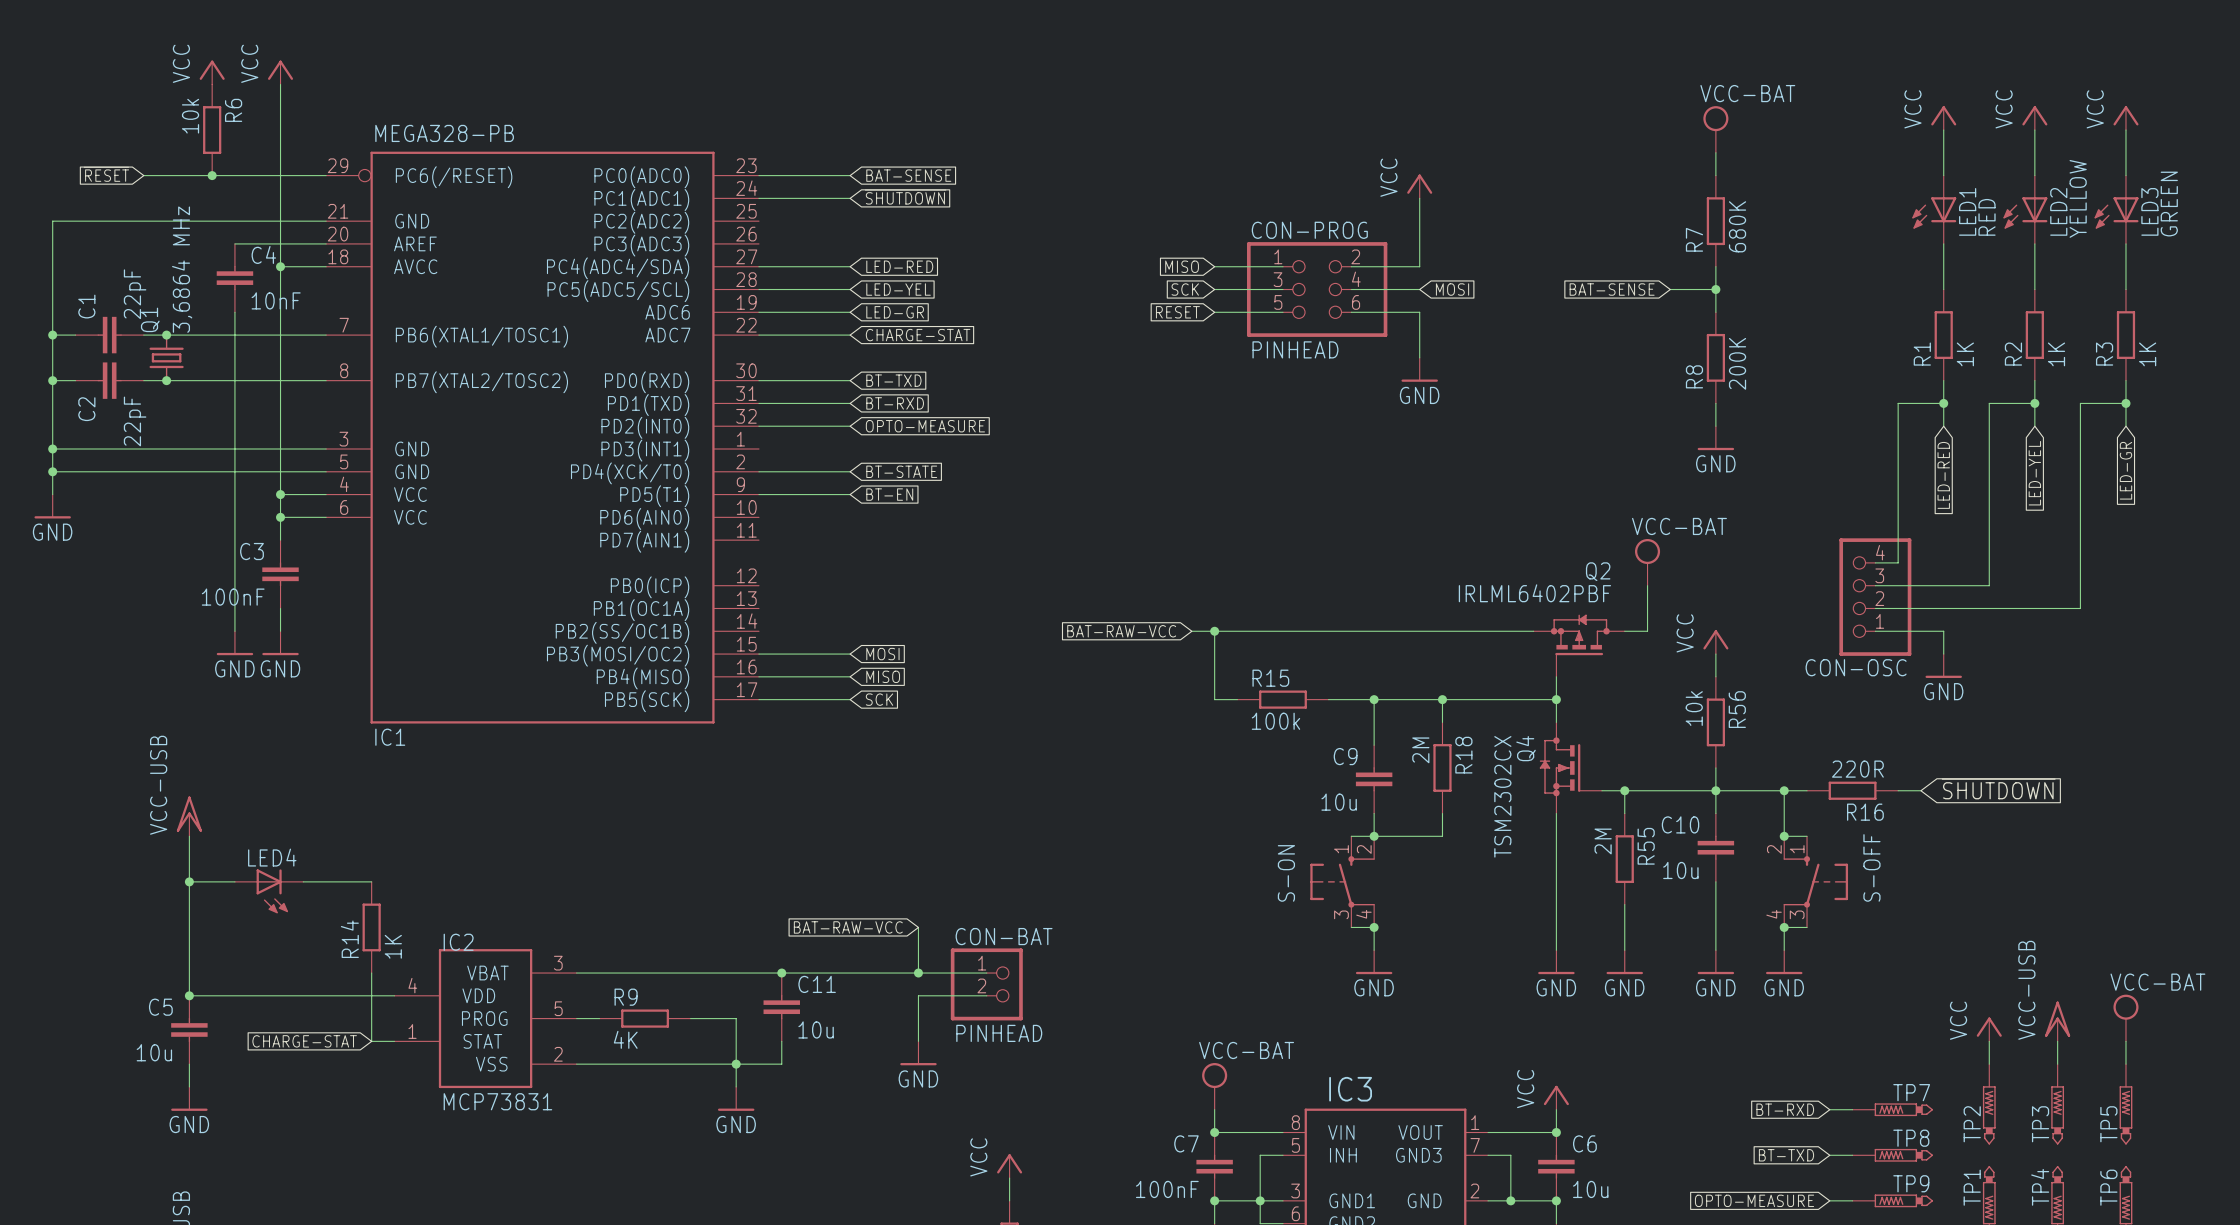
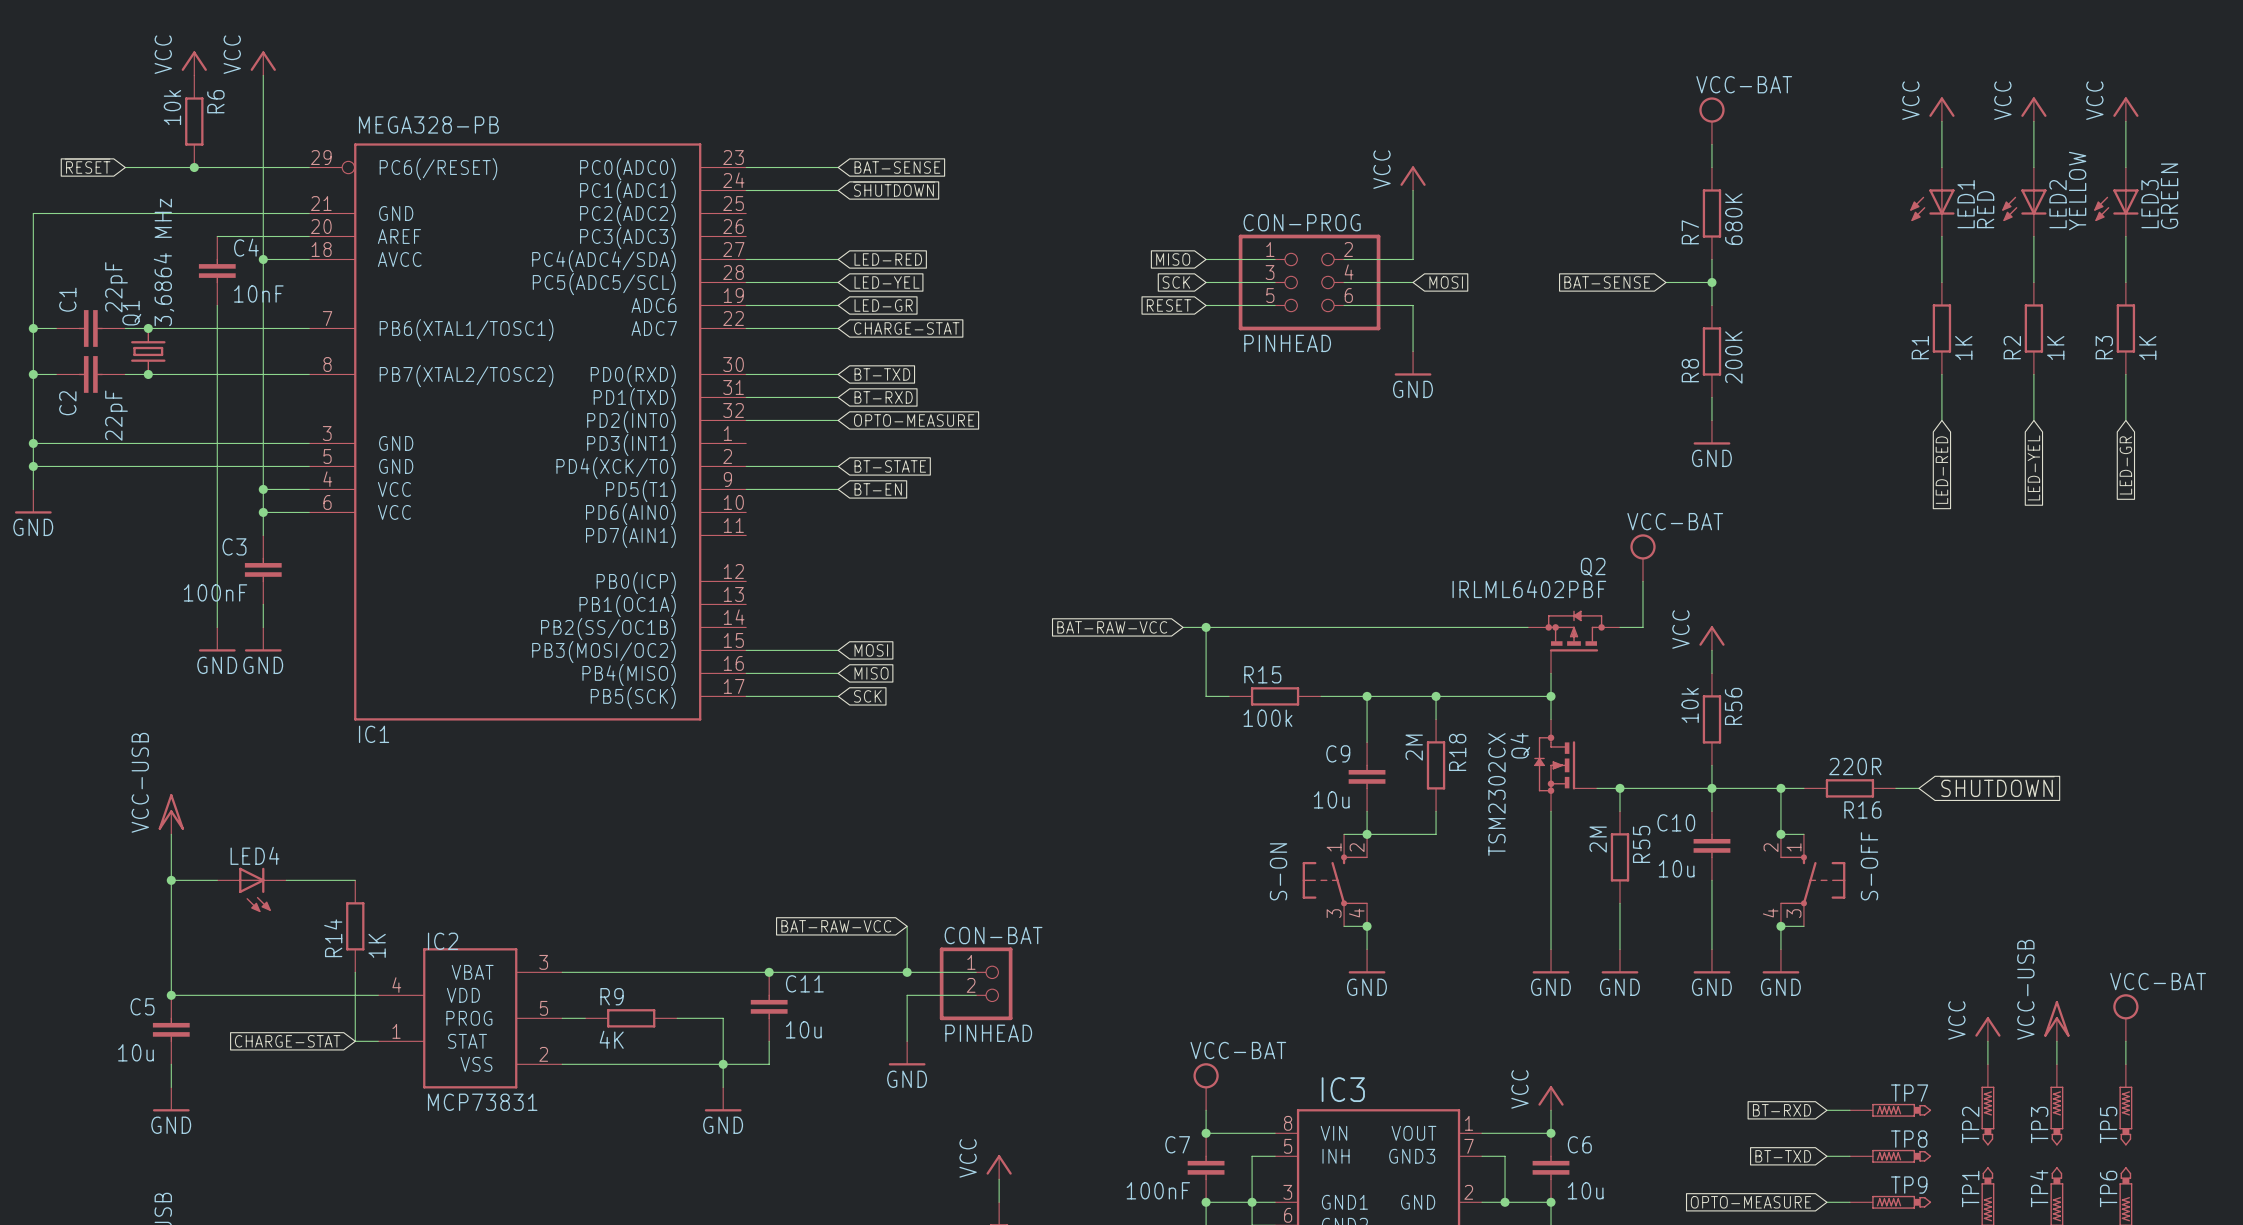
wire: (1943, 403) (1898, 403) (1898, 562) (1875, 562) -> none
junction: (1943, 403) -> none
wire: (2034, 403) (1989, 403) (1989, 585) (1875, 585) -> none
junction: (2034, 403) -> none
wire: (2125, 403) (2080, 403) (2080, 608) (1875, 608) -> none
junction: (2125, 403) -> none
CON-OSC: (1875, 597) -> none
wire: (1875, 631) (1943, 631) (1943, 654) -> none
power symbol: GND (1943, 666) -> none

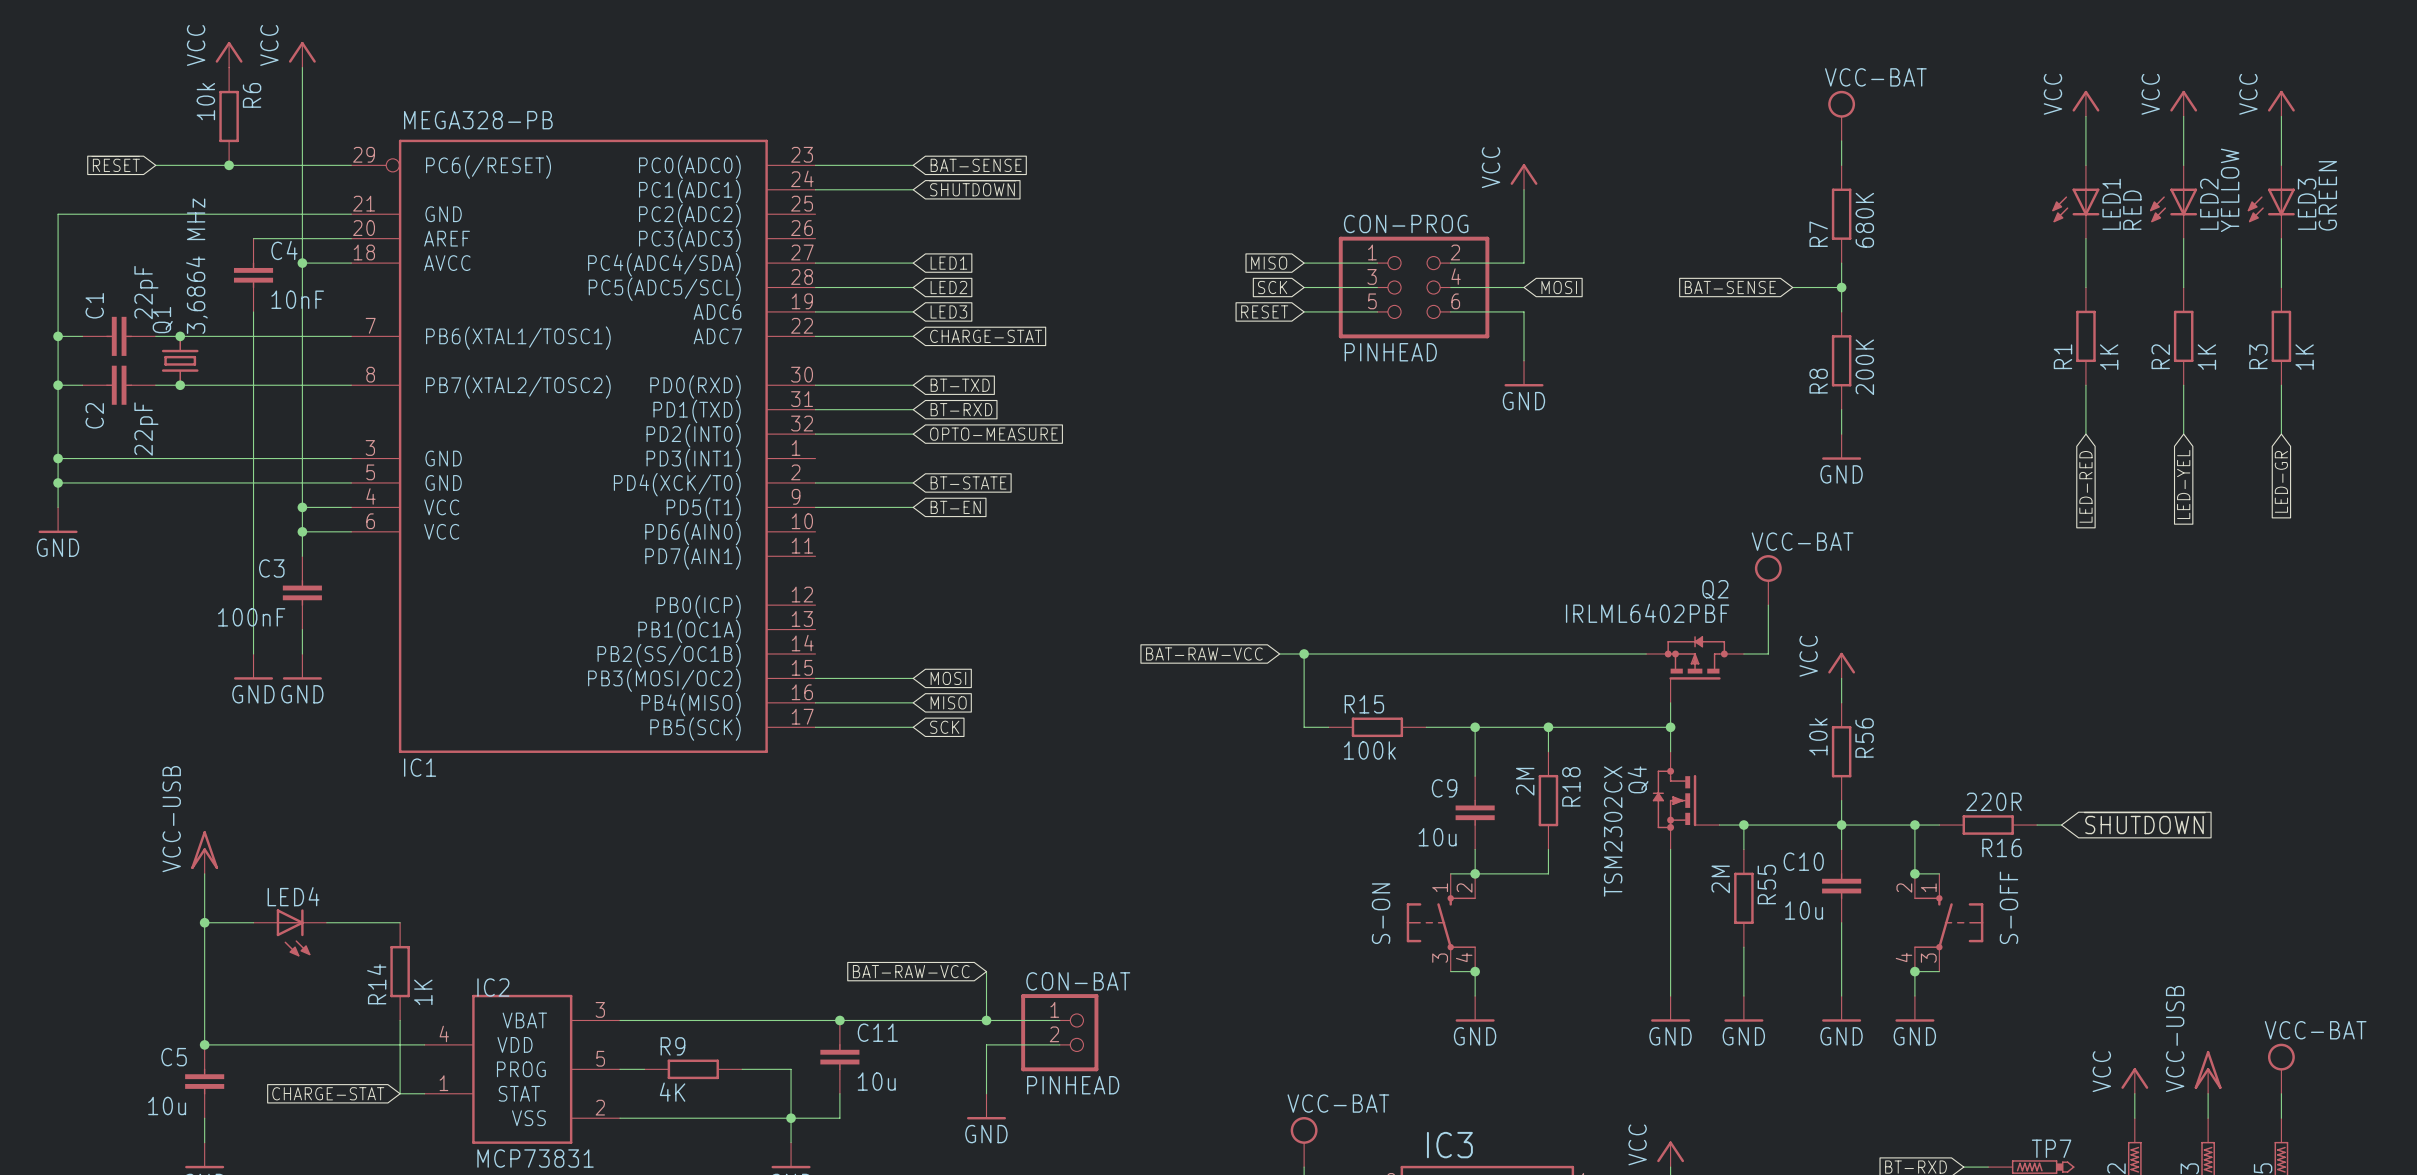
global label: LED-RED (888, 259) -> LED1 (948, 263)
global label: LED-YEL (887, 282) -> LED2 (948, 287)
global label: LED-GR (883, 305) -> LED3 (948, 311)

